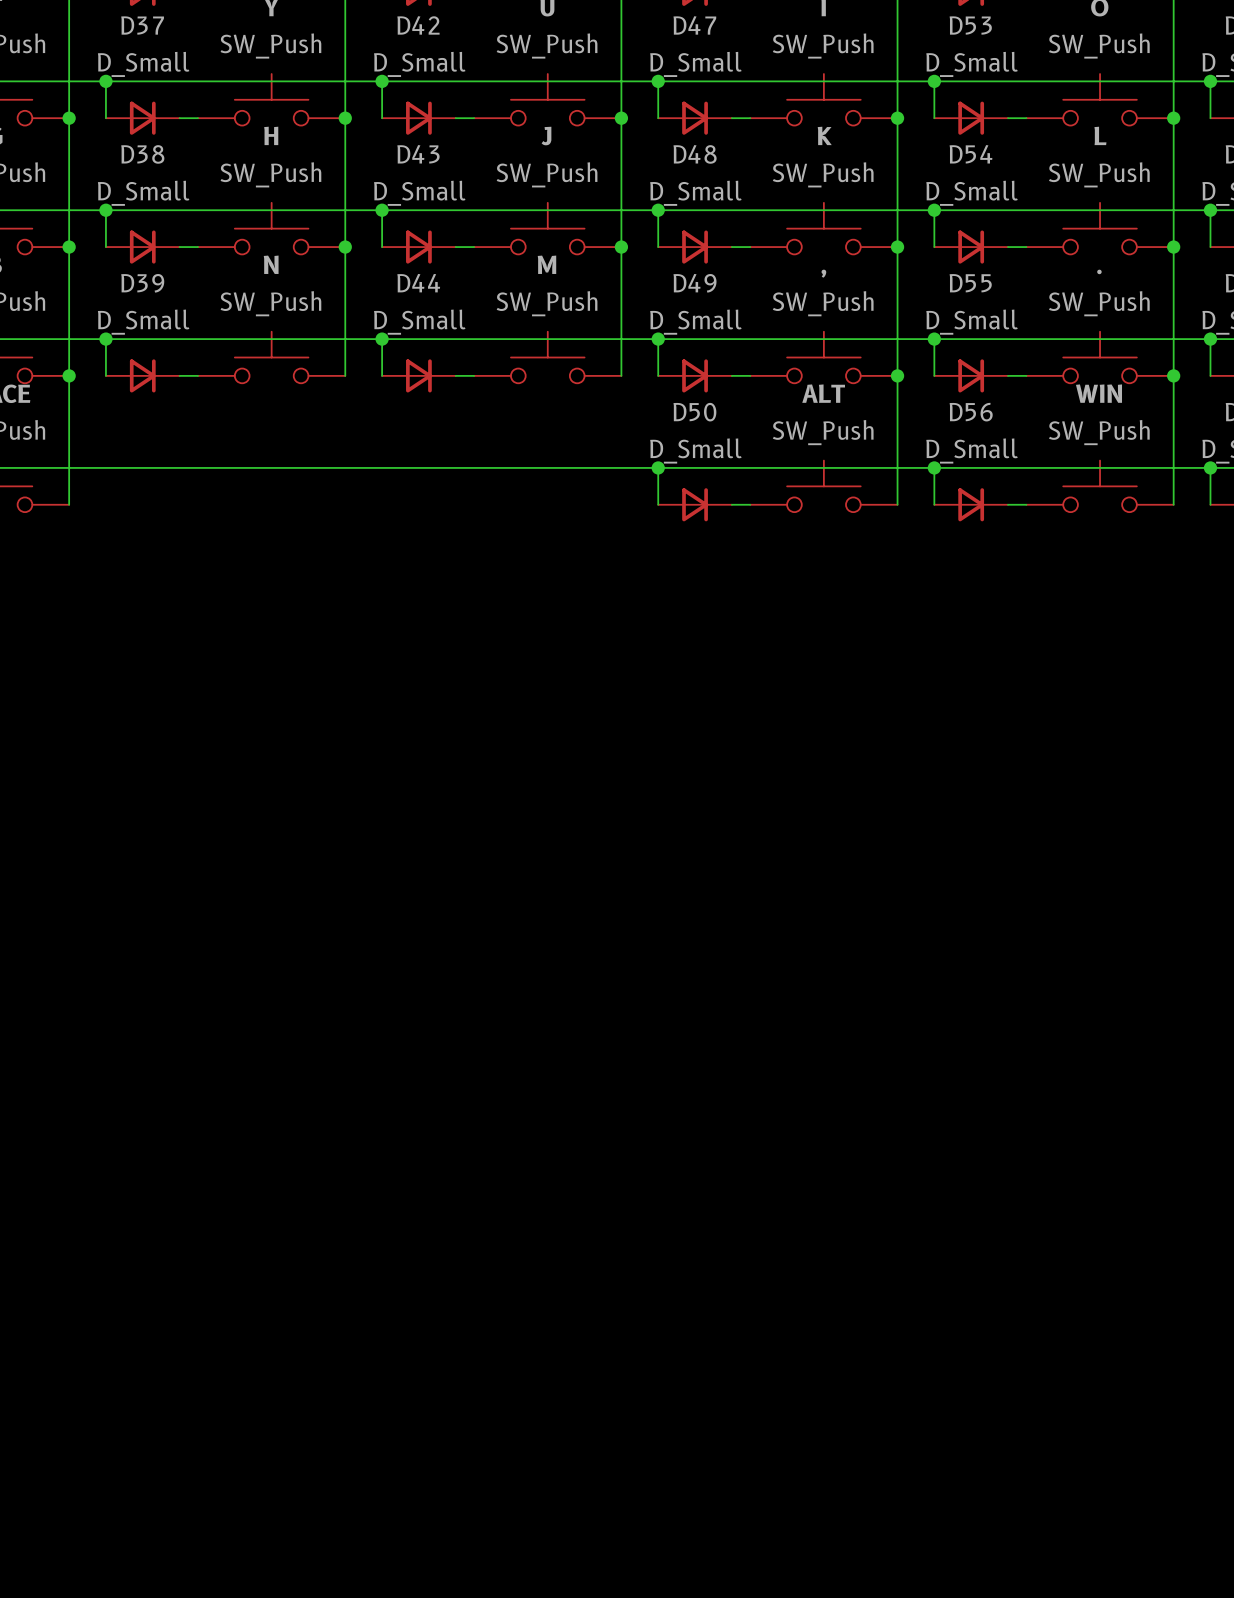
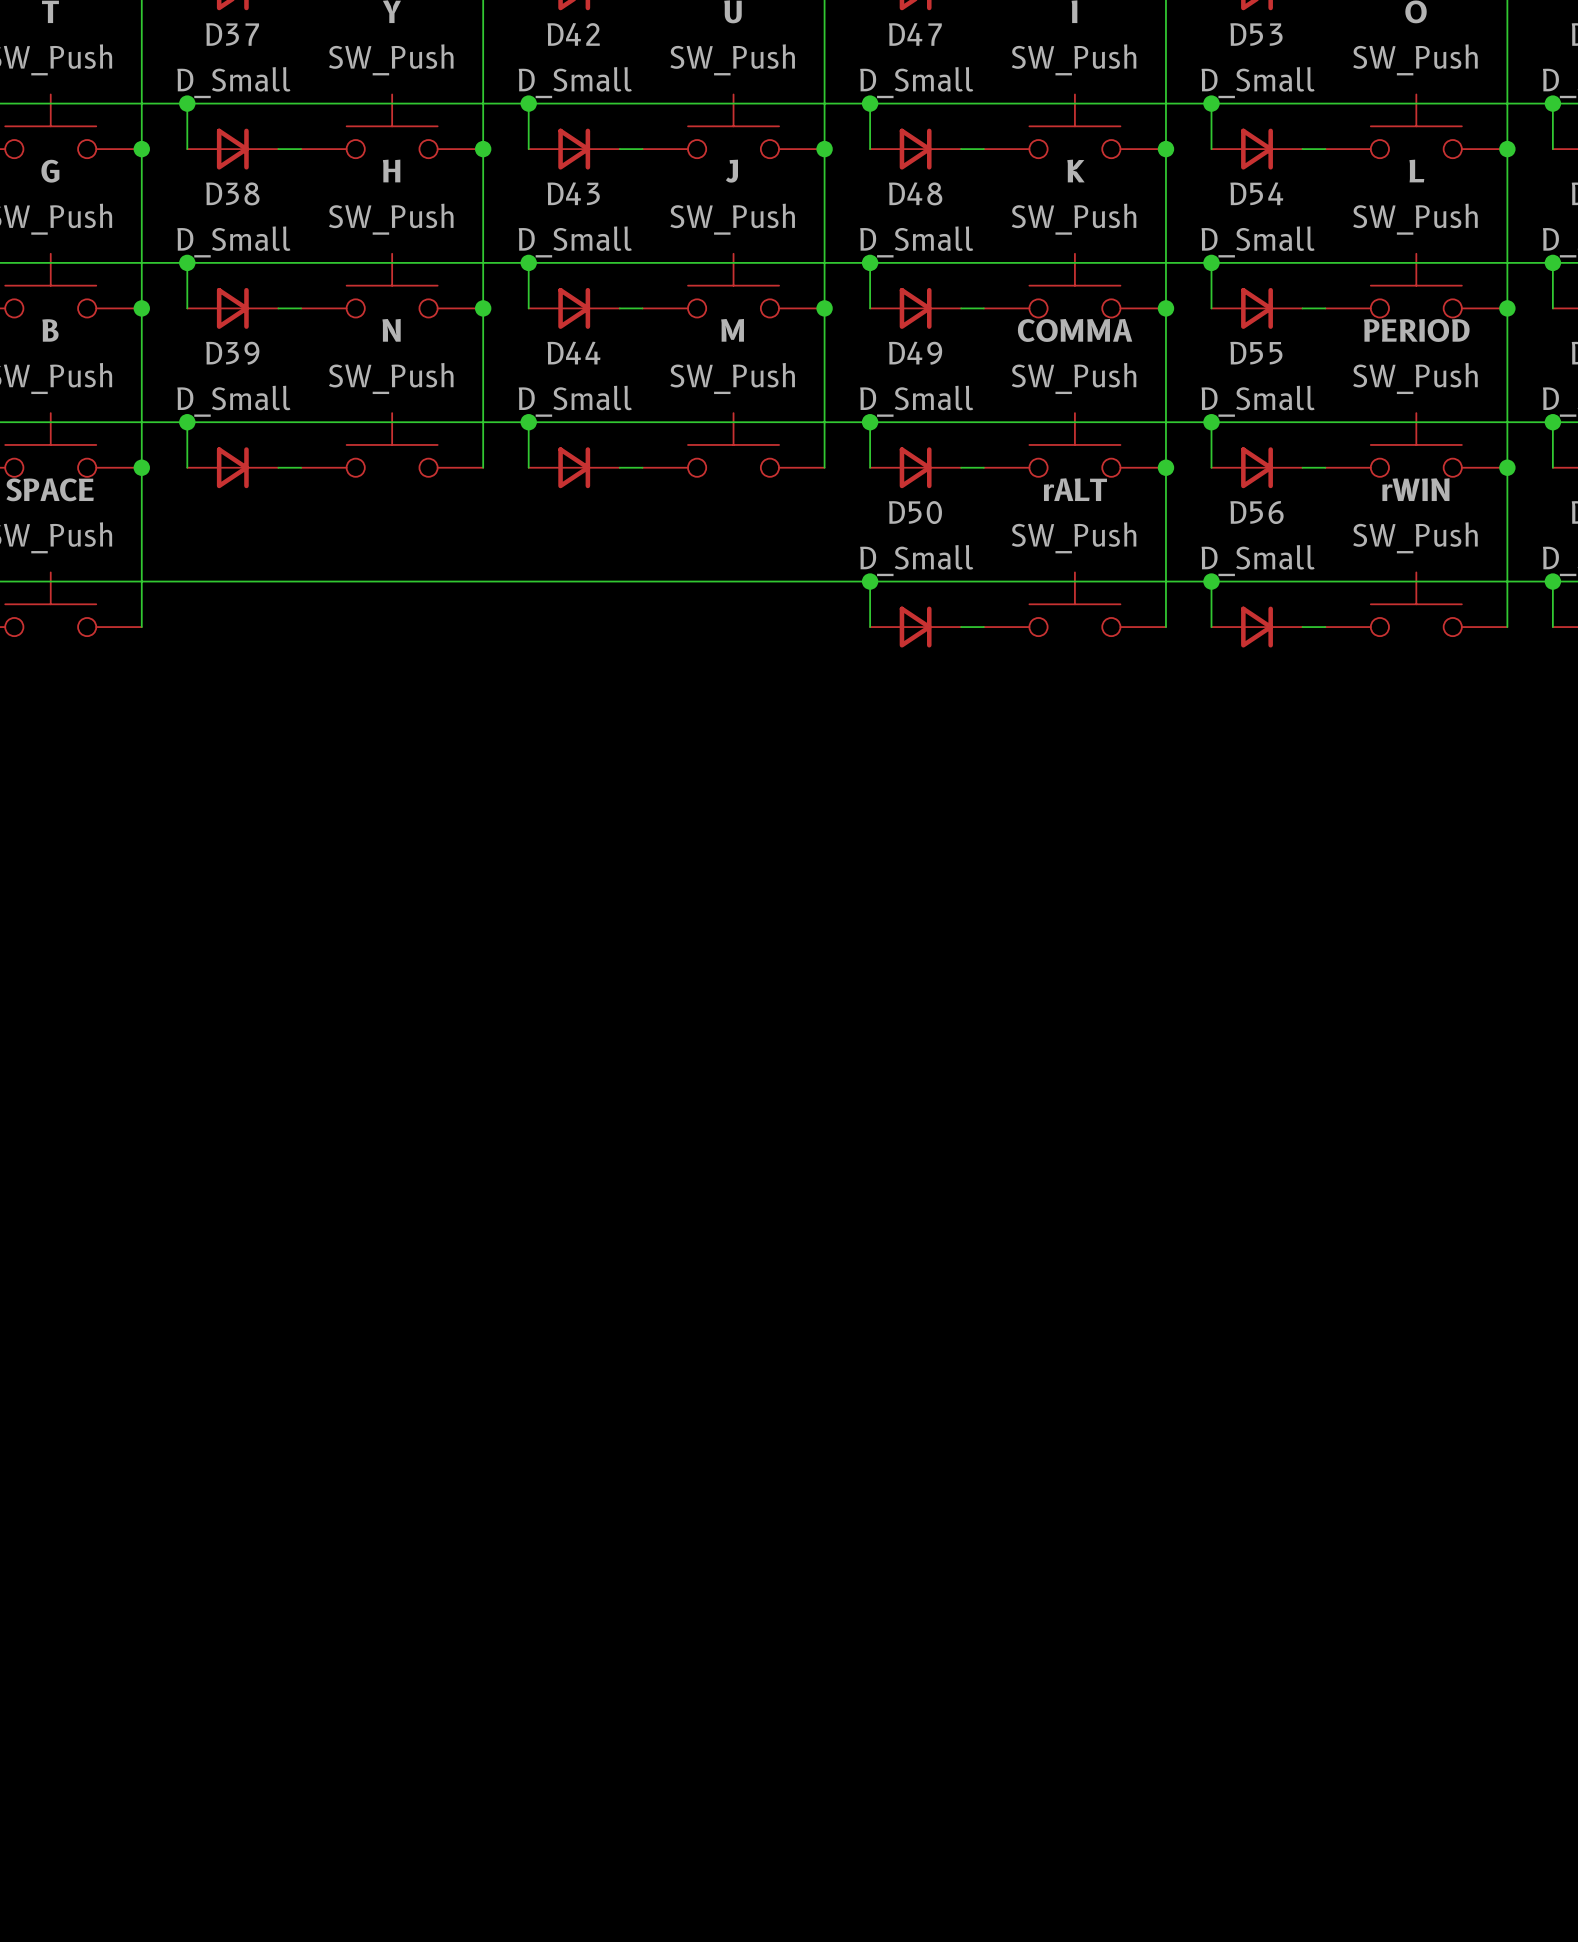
PERIOD name: . (1099, 271) -> PERIOD (1416, 330)
COMMA name: , (823, 273) -> COMMA (1075, 330)
ALT name: ALT (823, 393) -> rALT (1075, 489)
WIN name: WIN (1098, 393) -> rWIN (1415, 489)

